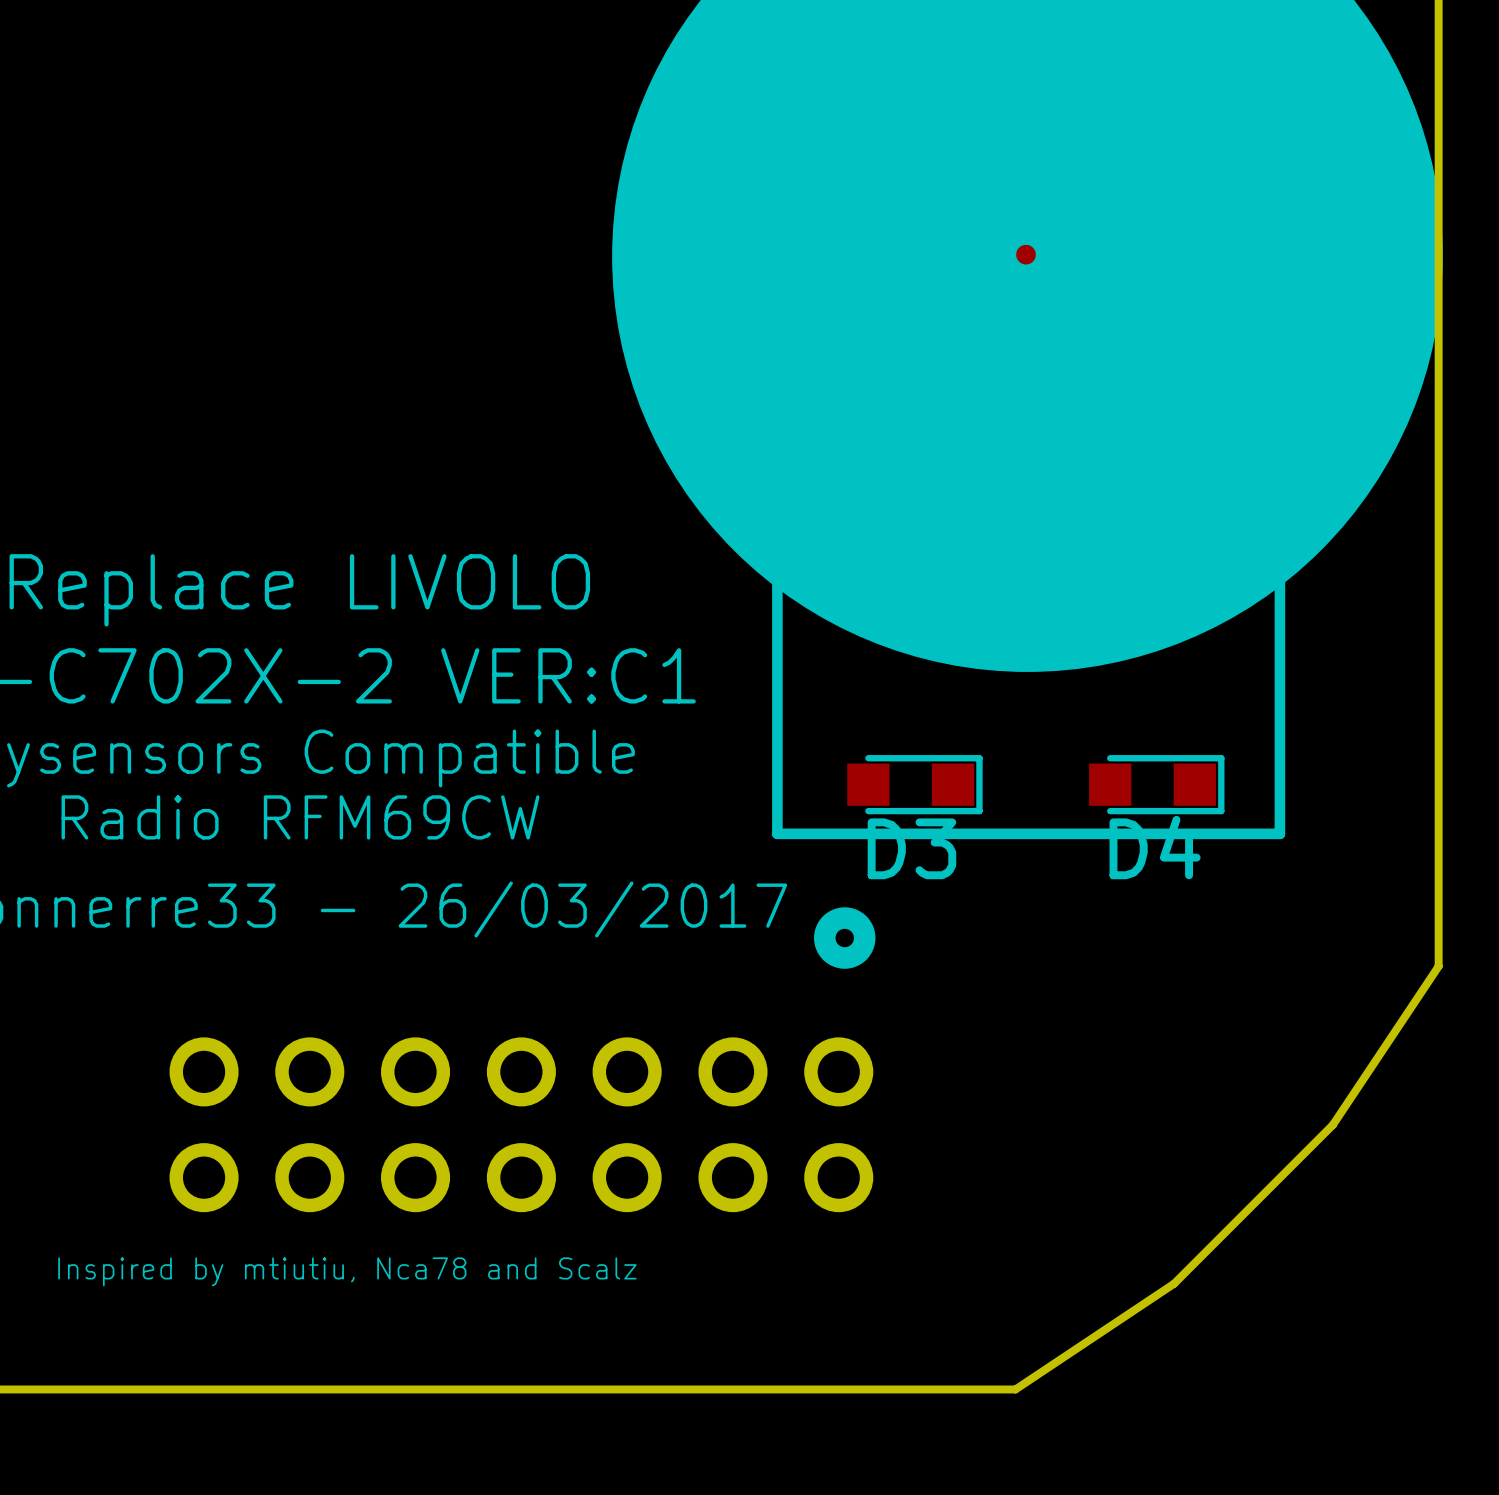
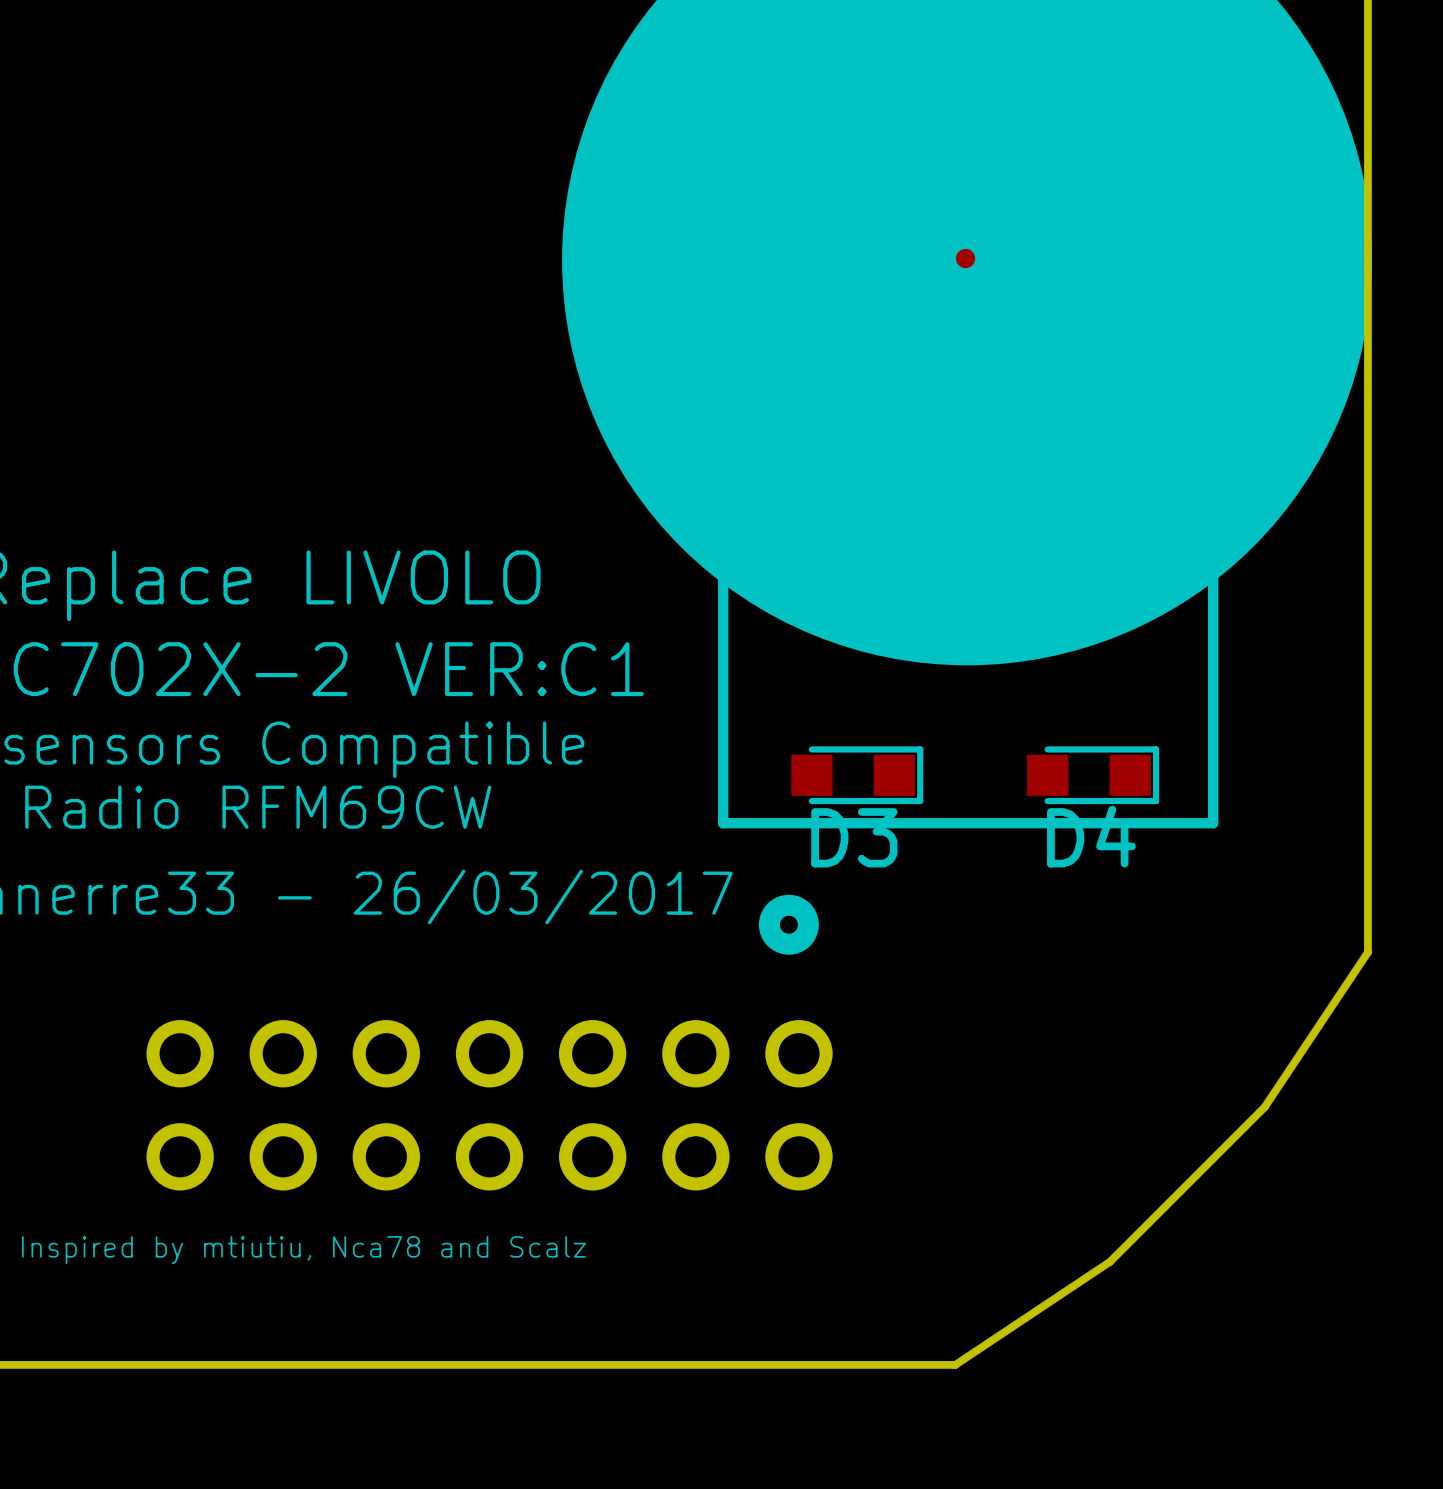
part position: (521, 1124) -> (489, 1105)

